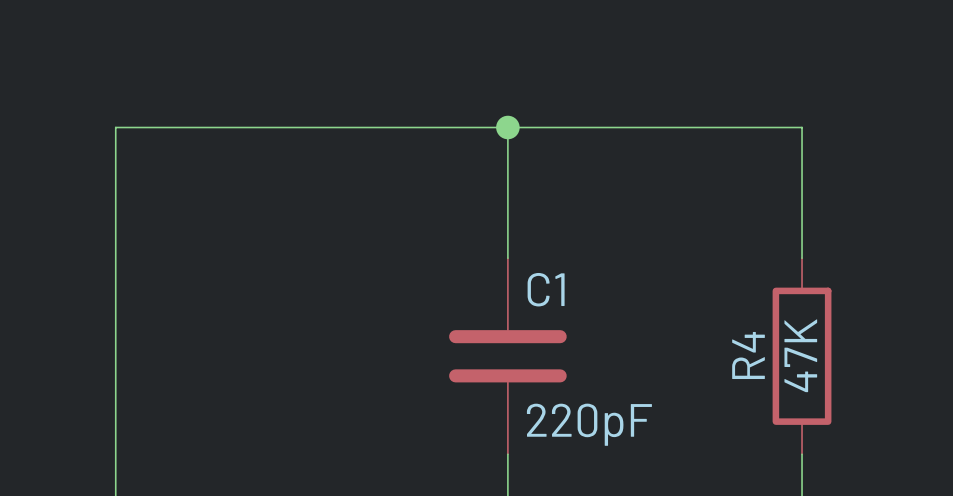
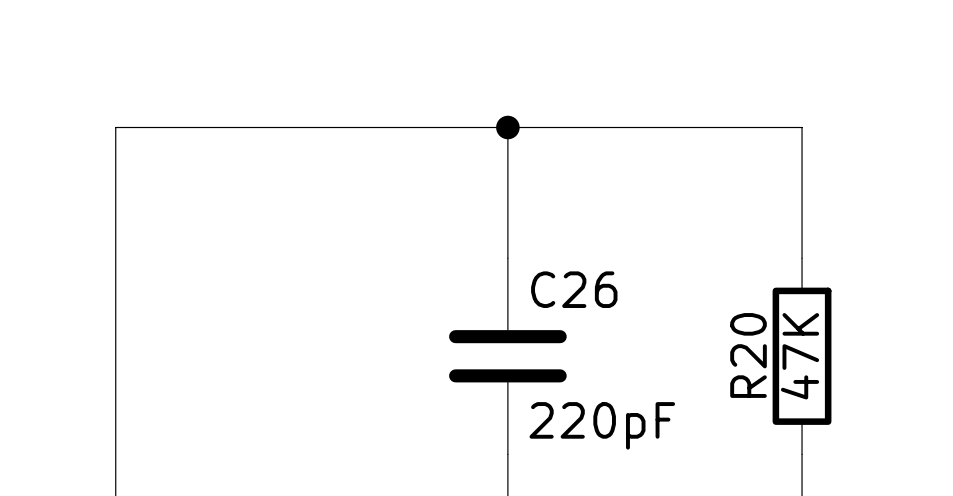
C1 name: C1 (546, 289) -> C26 (574, 289)
R4 name: R4 (748, 355) -> R20 (748, 355)

